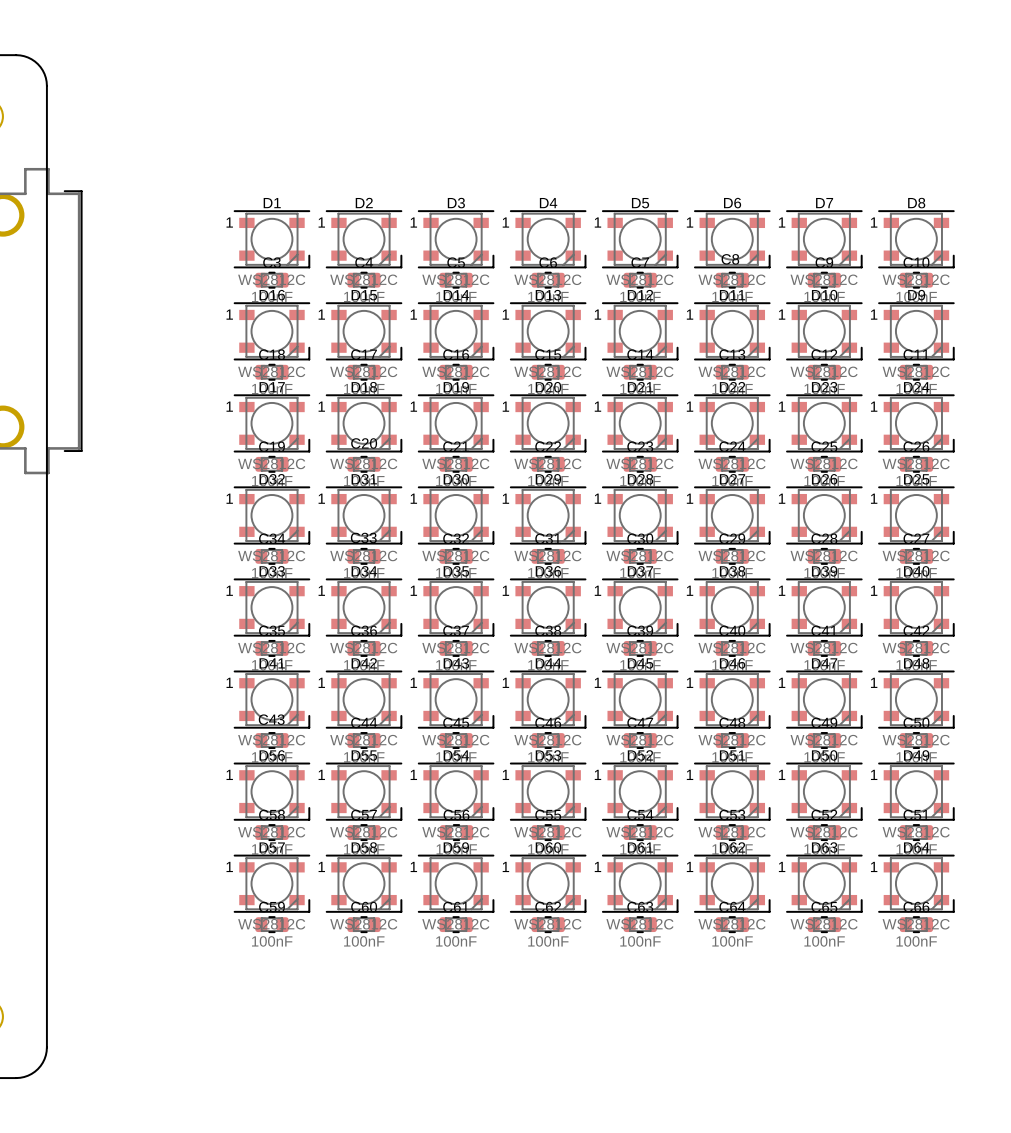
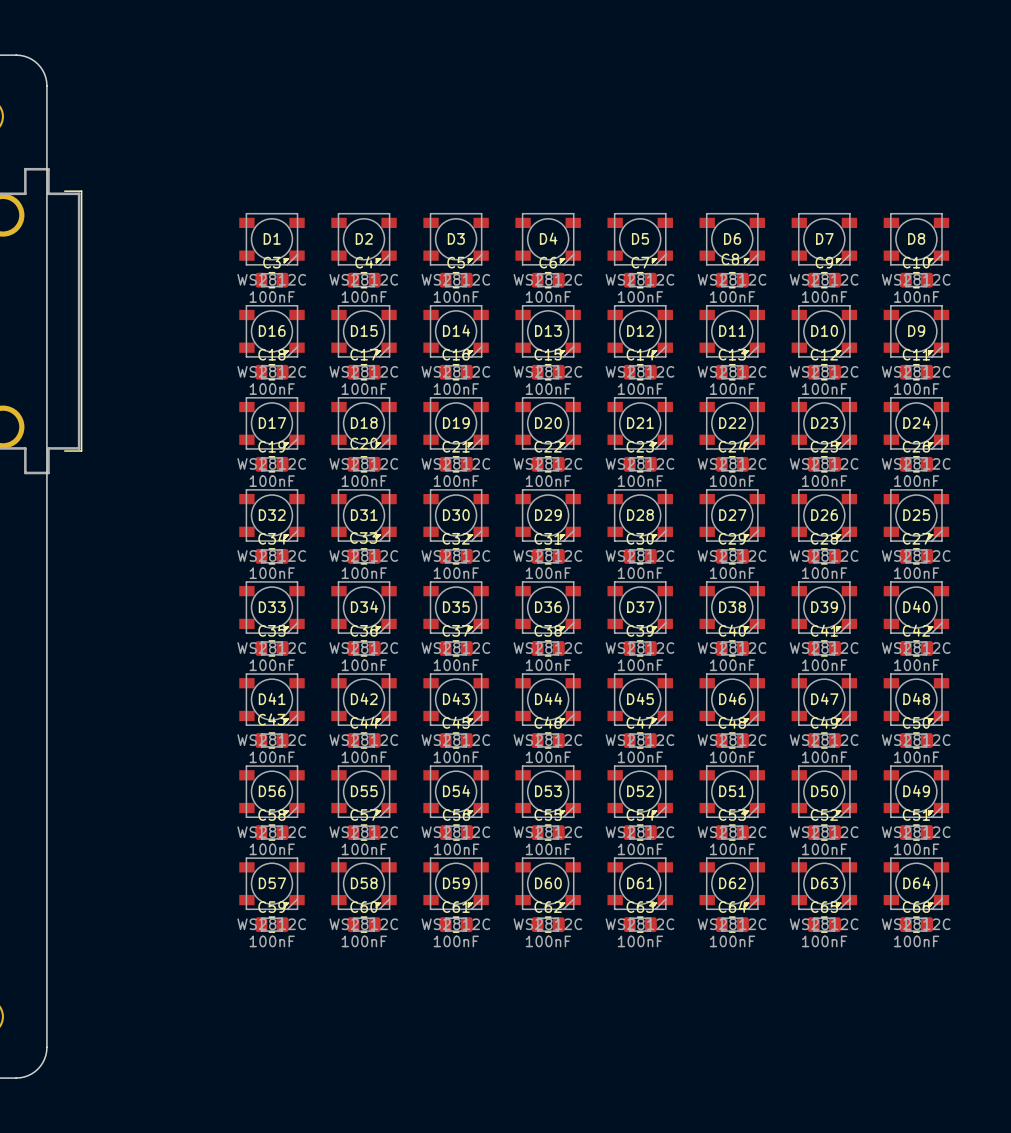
D1 name position: D1 (272, 203) -> D1 (272, 238)
D2 name position: D2 (364, 203) -> D2 (364, 238)
D3 name position: D3 (456, 203) -> D3 (456, 238)
D4 name position: D4 (548, 203) -> D4 (548, 238)
D5 name position: D5 (640, 203) -> D5 (640, 238)
D6 name position: D6 (732, 203) -> D6 (732, 238)
D7 name position: D7 (824, 203) -> D7 (824, 238)
D8 name position: D8 (916, 203) -> D8 (916, 238)
D1 footprint: [234, 210, 310, 269] -> [239, 213, 305, 266]
D2 footprint: [326, 210, 402, 269] -> [331, 213, 397, 266]
D3 footprint: [418, 210, 495, 269] -> [423, 213, 489, 266]
D4 footprint: [510, 210, 587, 269] -> [515, 213, 581, 266]
D5 footprint: [602, 210, 679, 269] -> [607, 213, 673, 266]
D6 footprint: [694, 210, 771, 269] -> [699, 213, 766, 266]
D7 footprint: [786, 210, 863, 269] -> [791, 213, 858, 266]
D8 footprint: [878, 210, 955, 269] -> [883, 213, 950, 266]
D16 name position: D16 (272, 295) -> D16 (272, 330)
D15 name position: D15 (364, 295) -> D15 (364, 330)
D14 name position: D14 (456, 295) -> D14 (456, 330)
D13 name position: D13 (548, 295) -> D13 (548, 330)
D12 name position: D12 (640, 295) -> D12 (640, 330)
D11 name position: D11 (732, 295) -> D11 (732, 330)
D10 name position: D10 (824, 295) -> D10 (824, 330)
D9 name position: D9 (916, 295) -> D9 (916, 330)
D16 footprint: [234, 302, 310, 361] -> [239, 305, 305, 358]
D15 footprint: [326, 302, 402, 361] -> [331, 305, 397, 358]
D14 footprint: [418, 302, 495, 361] -> [423, 305, 489, 358]
D13 footprint: [510, 302, 587, 361] -> [515, 305, 581, 358]
D12 footprint: [602, 302, 679, 361] -> [607, 305, 673, 358]
D11 footprint: [694, 302, 771, 361] -> [699, 305, 766, 358]
D10 footprint: [786, 302, 863, 361] -> [791, 305, 858, 358]
D9 footprint: [878, 302, 955, 361] -> [883, 305, 950, 358]
D17 name position: D17 (272, 387) -> D17 (272, 423)
D18 name position: D18 (364, 387) -> D18 (364, 423)
D19 name position: D19 (456, 387) -> D19 (456, 423)
D20 name position: D20 (548, 387) -> D20 (548, 423)
D21 name position: D21 (640, 387) -> D21 (640, 423)
D22 name position: D22 (732, 387) -> D22 (732, 423)
D23 name position: D23 (824, 387) -> D23 (824, 423)
D24 name position: D24 (916, 387) -> D24 (916, 422)
D17 footprint: [234, 394, 310, 453] -> [239, 397, 305, 450]
D18 footprint: [326, 394, 402, 453] -> [331, 397, 397, 450]
D19 footprint: [418, 394, 495, 453] -> [423, 397, 489, 450]
D20 footprint: [510, 394, 587, 453] -> [515, 397, 581, 450]
D21 footprint: [602, 394, 679, 453] -> [607, 397, 673, 450]
D22 footprint: [694, 394, 771, 453] -> [699, 397, 766, 450]
D23 footprint: [786, 394, 863, 453] -> [791, 397, 858, 450]
D24 footprint: [878, 394, 955, 453] -> [883, 397, 950, 450]
D32 name position: D32 (272, 479) -> D32 (272, 515)
D31 name position: D31 (364, 479) -> D31 (364, 515)
D30 name position: D30 (456, 479) -> D30 (456, 515)
D29 name position: D29 (548, 479) -> D29 (548, 515)
D28 name position: D28 (640, 479) -> D28 (640, 515)
D27 name position: D27 (732, 479) -> D27 (732, 515)
D26 name position: D26 (824, 479) -> D26 (824, 515)
D25 name position: D25 (916, 479) -> D25 (916, 515)
D32 footprint: [234, 486, 310, 545] -> [239, 489, 305, 542]
D31 footprint: [326, 486, 402, 545] -> [331, 489, 397, 542]
D30 footprint: [418, 486, 495, 545] -> [423, 489, 489, 542]
D29 footprint: [510, 486, 587, 545] -> [515, 489, 581, 542]
D28 footprint: [602, 486, 679, 545] -> [607, 489, 673, 542]
D27 footprint: [694, 486, 771, 545] -> [699, 489, 766, 542]
D26 footprint: [786, 486, 863, 545] -> [791, 489, 858, 542]
D25 footprint: [878, 486, 955, 545] -> [883, 489, 950, 542]
D33 name position: D33 (272, 571) -> D33 (272, 607)
D34 name position: D34 (364, 571) -> D34 (364, 606)
D35 name position: D35 (456, 571) -> D35 (456, 607)
D36 name position: D36 (548, 571) -> D36 (548, 607)
D37 name position: D37 (640, 571) -> D37 (640, 607)
D38 name position: D38 (732, 571) -> D38 (732, 607)
D39 name position: D39 (824, 571) -> D39 (824, 607)
D40 name position: D40 (916, 571) -> D40 (916, 606)
D33 footprint: [234, 578, 310, 637] -> [239, 581, 305, 634]
D34 footprint: [326, 578, 402, 637] -> [331, 581, 397, 634]
D35 footprint: [418, 578, 495, 637] -> [423, 581, 489, 634]
D36 footprint: [510, 578, 587, 637] -> [515, 581, 581, 634]
D37 footprint: [602, 578, 679, 637] -> [607, 581, 673, 634]
D38 footprint: [694, 578, 771, 637] -> [699, 581, 766, 634]
D39 footprint: [786, 578, 863, 637] -> [791, 581, 858, 634]
D40 footprint: [878, 578, 955, 637] -> [883, 581, 950, 634]
D41 name position: D41 (272, 663) -> D41 (272, 698)
D42 name position: D42 (364, 663) -> D42 (364, 698)
D43 name position: D43 (456, 663) -> D43 (456, 698)
D44 name position: D44 (548, 663) -> D44 (548, 698)
D45 name position: D45 (640, 663) -> D45 (640, 698)
D46 name position: D46 (732, 663) -> D46 (732, 698)
D47 name position: D47 (824, 663) -> D47 (824, 698)
D48 name position: D48 (916, 663) -> D48 (916, 698)
D41 footprint: [234, 670, 310, 729] -> [239, 673, 305, 726]
D42 footprint: [326, 670, 402, 729] -> [331, 673, 397, 726]
D43 footprint: [418, 670, 495, 729] -> [423, 673, 489, 726]
D44 footprint: [510, 670, 587, 729] -> [515, 673, 581, 726]
D45 footprint: [602, 670, 679, 729] -> [607, 673, 673, 726]
D46 footprint: [694, 670, 771, 729] -> [699, 673, 766, 726]
D47 footprint: [786, 670, 863, 729] -> [791, 673, 858, 726]
D48 footprint: [878, 670, 955, 729] -> [883, 673, 950, 726]
D56 name position: D56 (272, 755) -> D56 (272, 791)
D55 name position: D55 (364, 755) -> D55 (364, 791)
D54 name position: D54 (456, 755) -> D54 (456, 791)
D53 name position: D53 (548, 755) -> D53 (548, 791)
D52 name position: D52 (640, 755) -> D52 (640, 791)
D51 name position: D51 (732, 755) -> D51 (732, 791)
D50 name position: D50 (824, 755) -> D50 (824, 791)
D49 name position: D49 (916, 755) -> D49 (916, 791)
D56 footprint: [234, 762, 310, 821] -> [239, 765, 305, 818]
D55 footprint: [326, 762, 402, 821] -> [331, 765, 397, 818]
D54 footprint: [418, 762, 495, 821] -> [423, 765, 489, 818]
D53 footprint: [510, 762, 587, 821] -> [515, 765, 581, 818]
D52 footprint: [602, 762, 679, 821] -> [607, 765, 673, 818]
D51 footprint: [694, 762, 771, 821] -> [699, 765, 766, 818]
D50 footprint: [786, 762, 863, 821] -> [791, 765, 858, 818]
D49 footprint: [878, 762, 955, 821] -> [883, 765, 950, 818]
D57 name position: D57 (272, 847) -> D57 (272, 883)
D58 name position: D58 (364, 847) -> D58 (364, 883)
D59 name position: D59 (456, 847) -> D59 (456, 883)
D60 name position: D60 (548, 847) -> D60 (548, 883)
D61 name position: D61 (640, 847) -> D61 (640, 883)
D62 name position: D62 (732, 847) -> D62 (732, 883)
D63 name position: D63 (824, 847) -> D63 (824, 883)
D64 name position: D64 (916, 847) -> D64 (916, 883)
D57 footprint: [234, 854, 310, 913] -> [239, 857, 305, 910]
D58 footprint: [326, 854, 402, 913] -> [331, 857, 397, 910]
D59 footprint: [418, 854, 495, 913] -> [423, 857, 489, 910]
D60 footprint: [510, 854, 587, 913] -> [515, 857, 581, 910]
D61 footprint: [602, 854, 679, 913] -> [607, 857, 673, 910]
D62 footprint: [694, 854, 771, 913] -> [699, 857, 766, 910]
D63 footprint: [786, 854, 863, 913] -> [791, 857, 858, 910]
D64 footprint: [878, 854, 955, 913] -> [883, 857, 950, 910]

